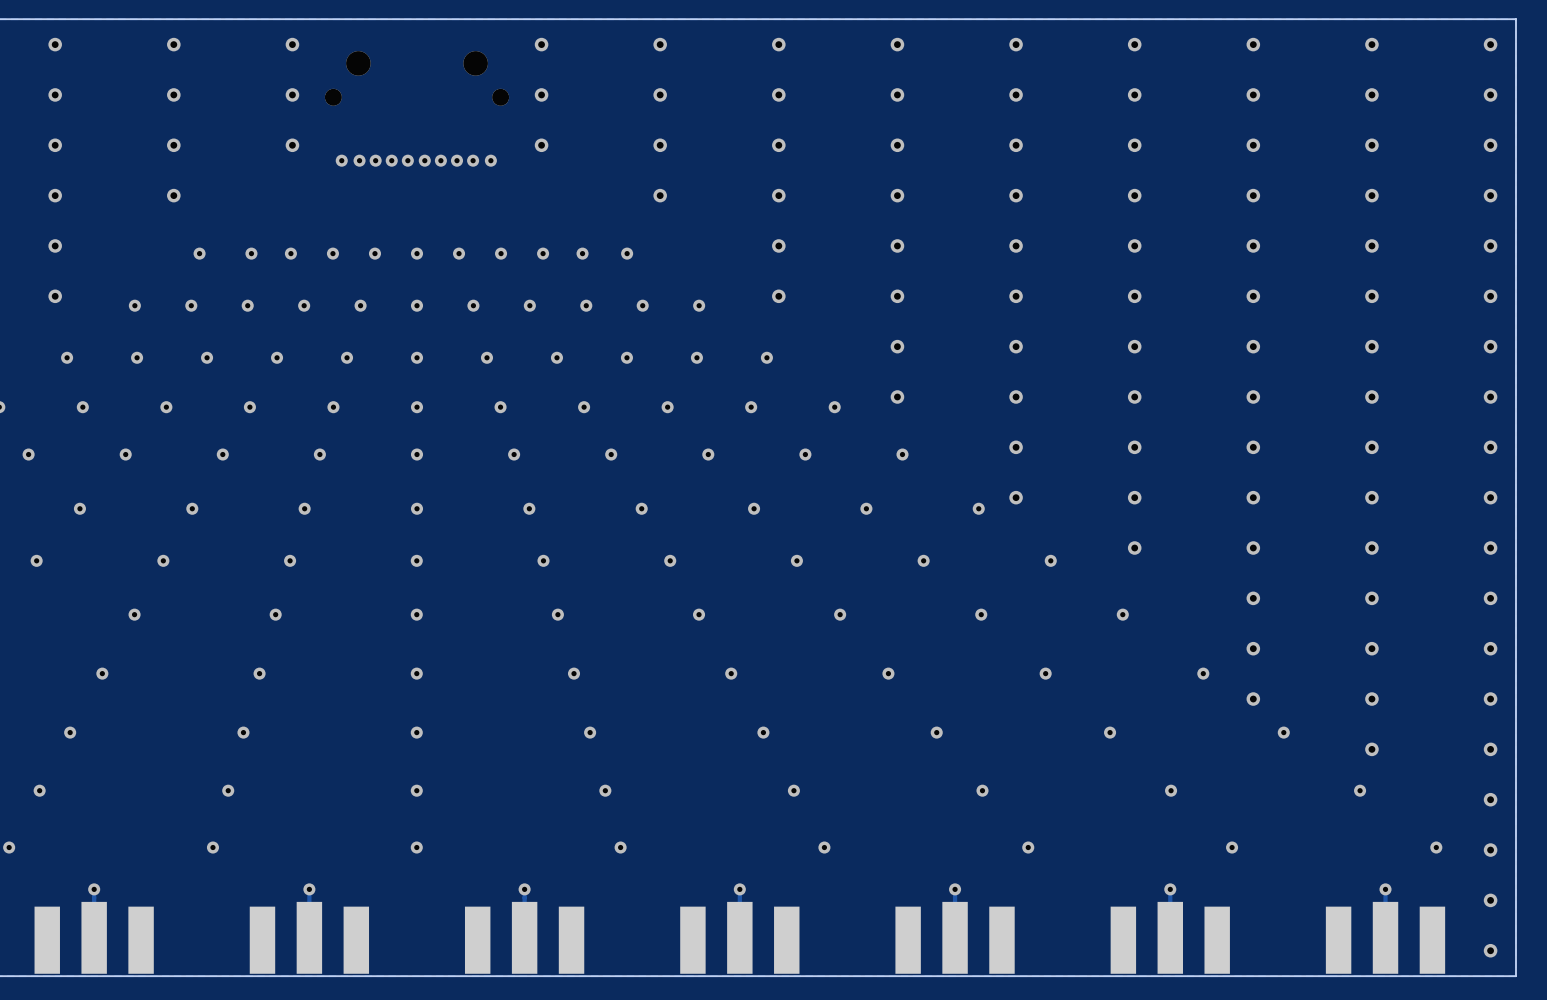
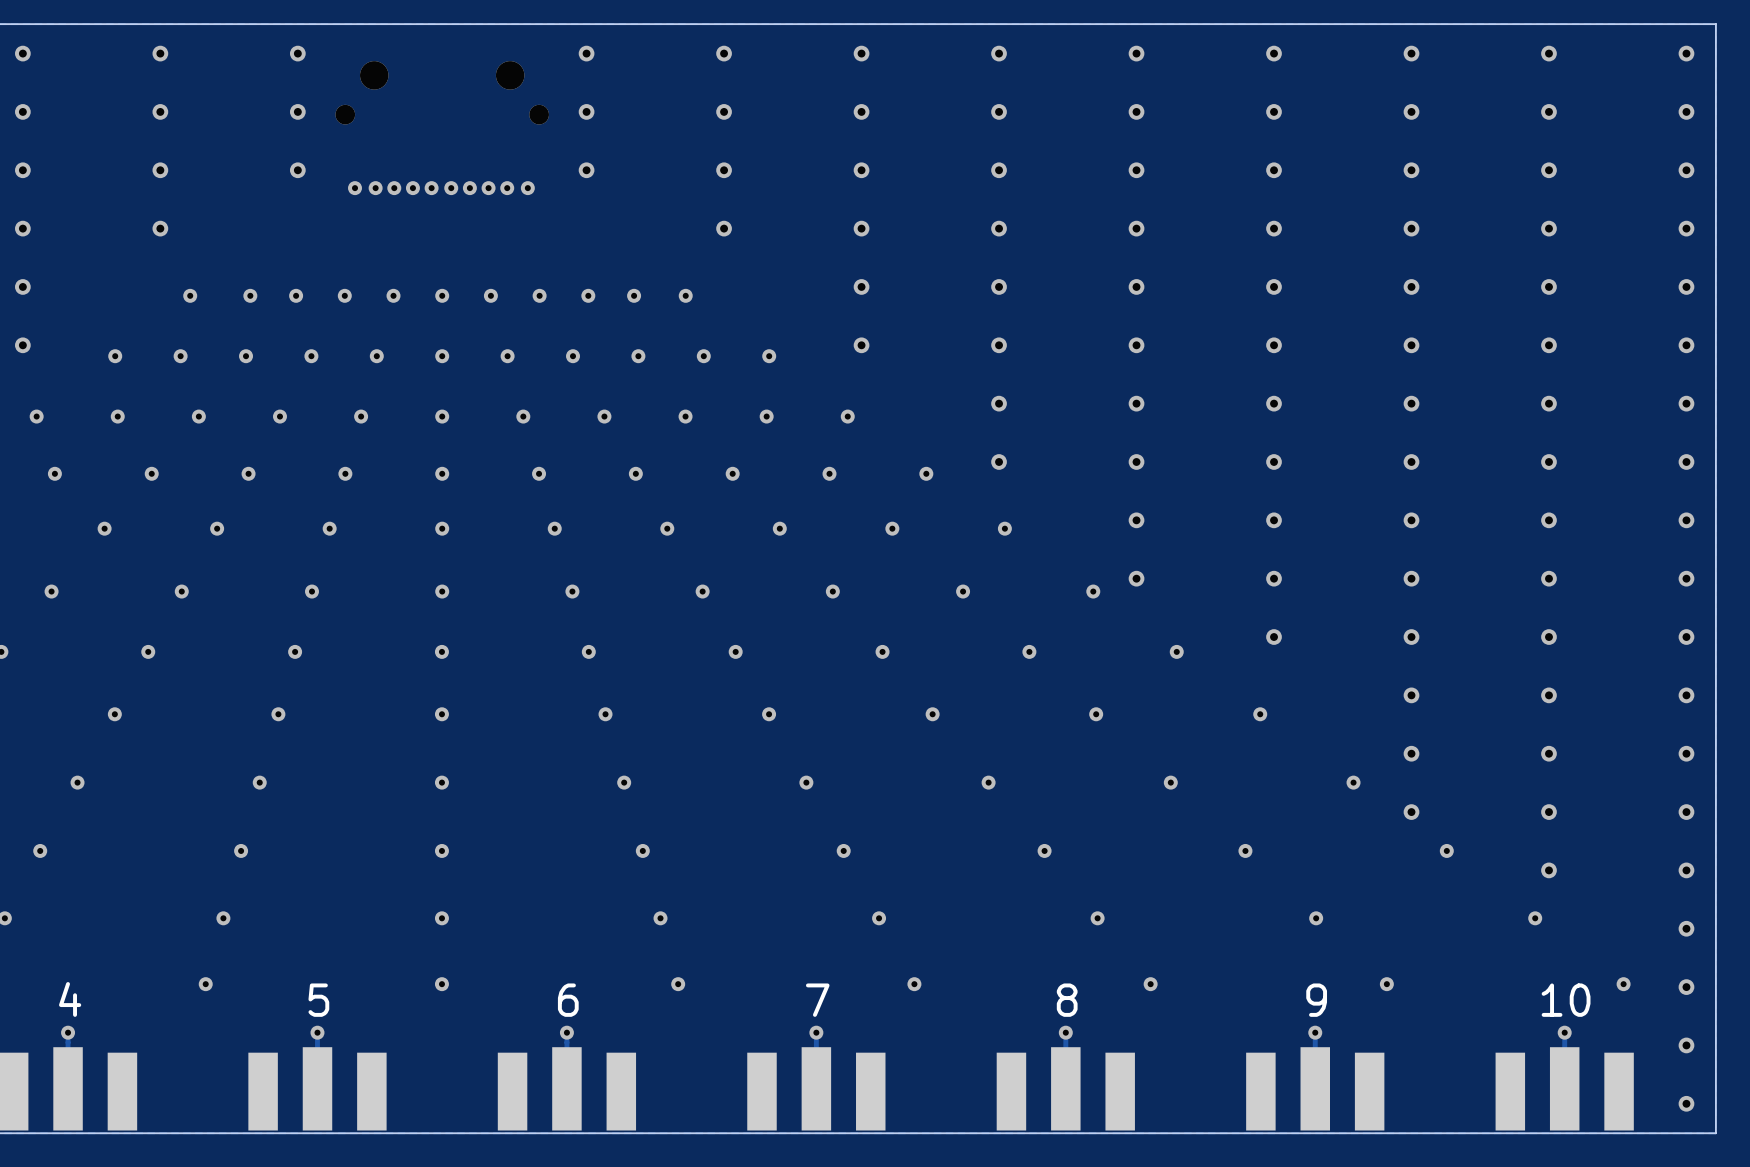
text: none -> 4 (70, 999)
text: none -> 5 (318, 1000)
text: none -> 6 (568, 1000)
text: none -> 7 (817, 1000)
text: none -> 8 (1067, 1000)
text: none -> 9 (1316, 1000)
text: none -> 10 (1566, 1000)

